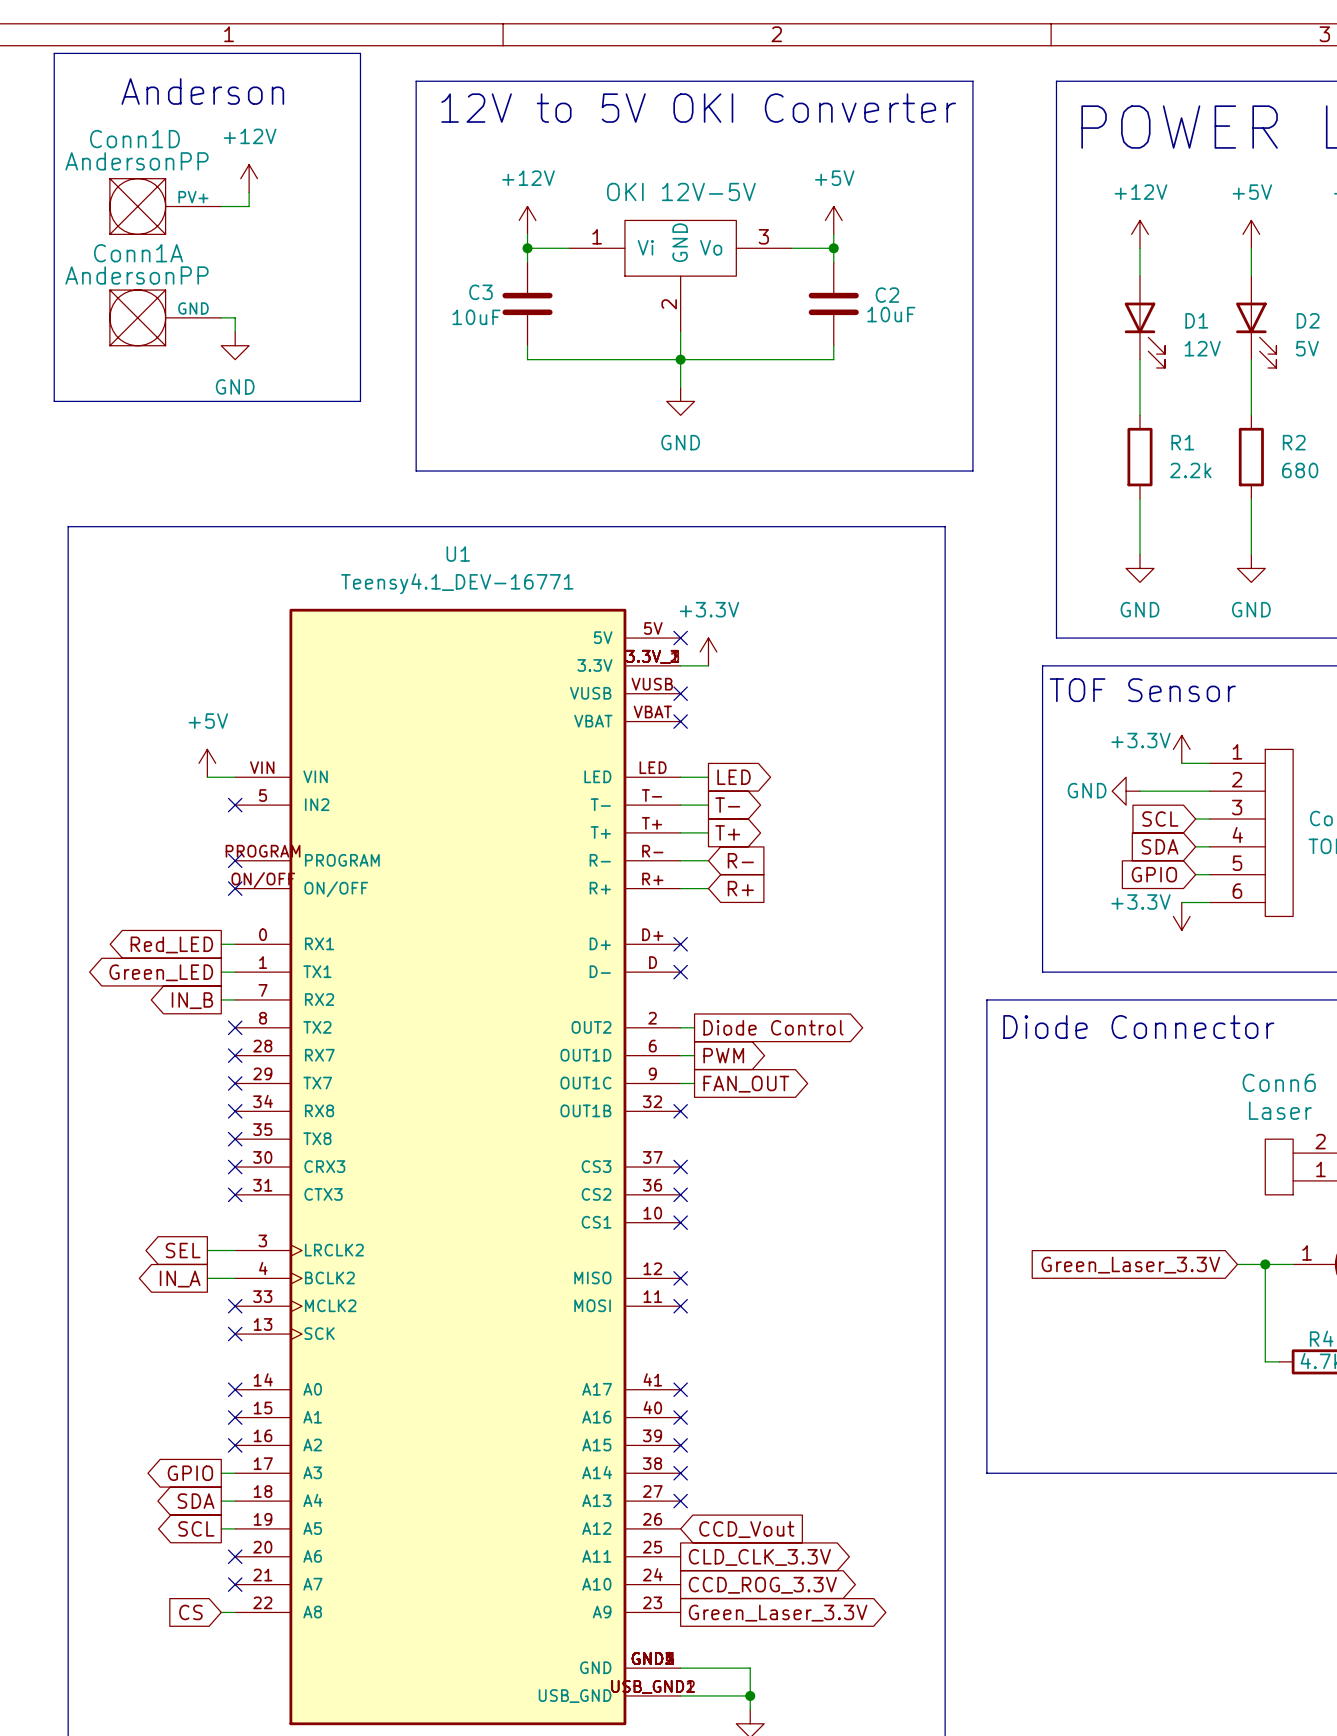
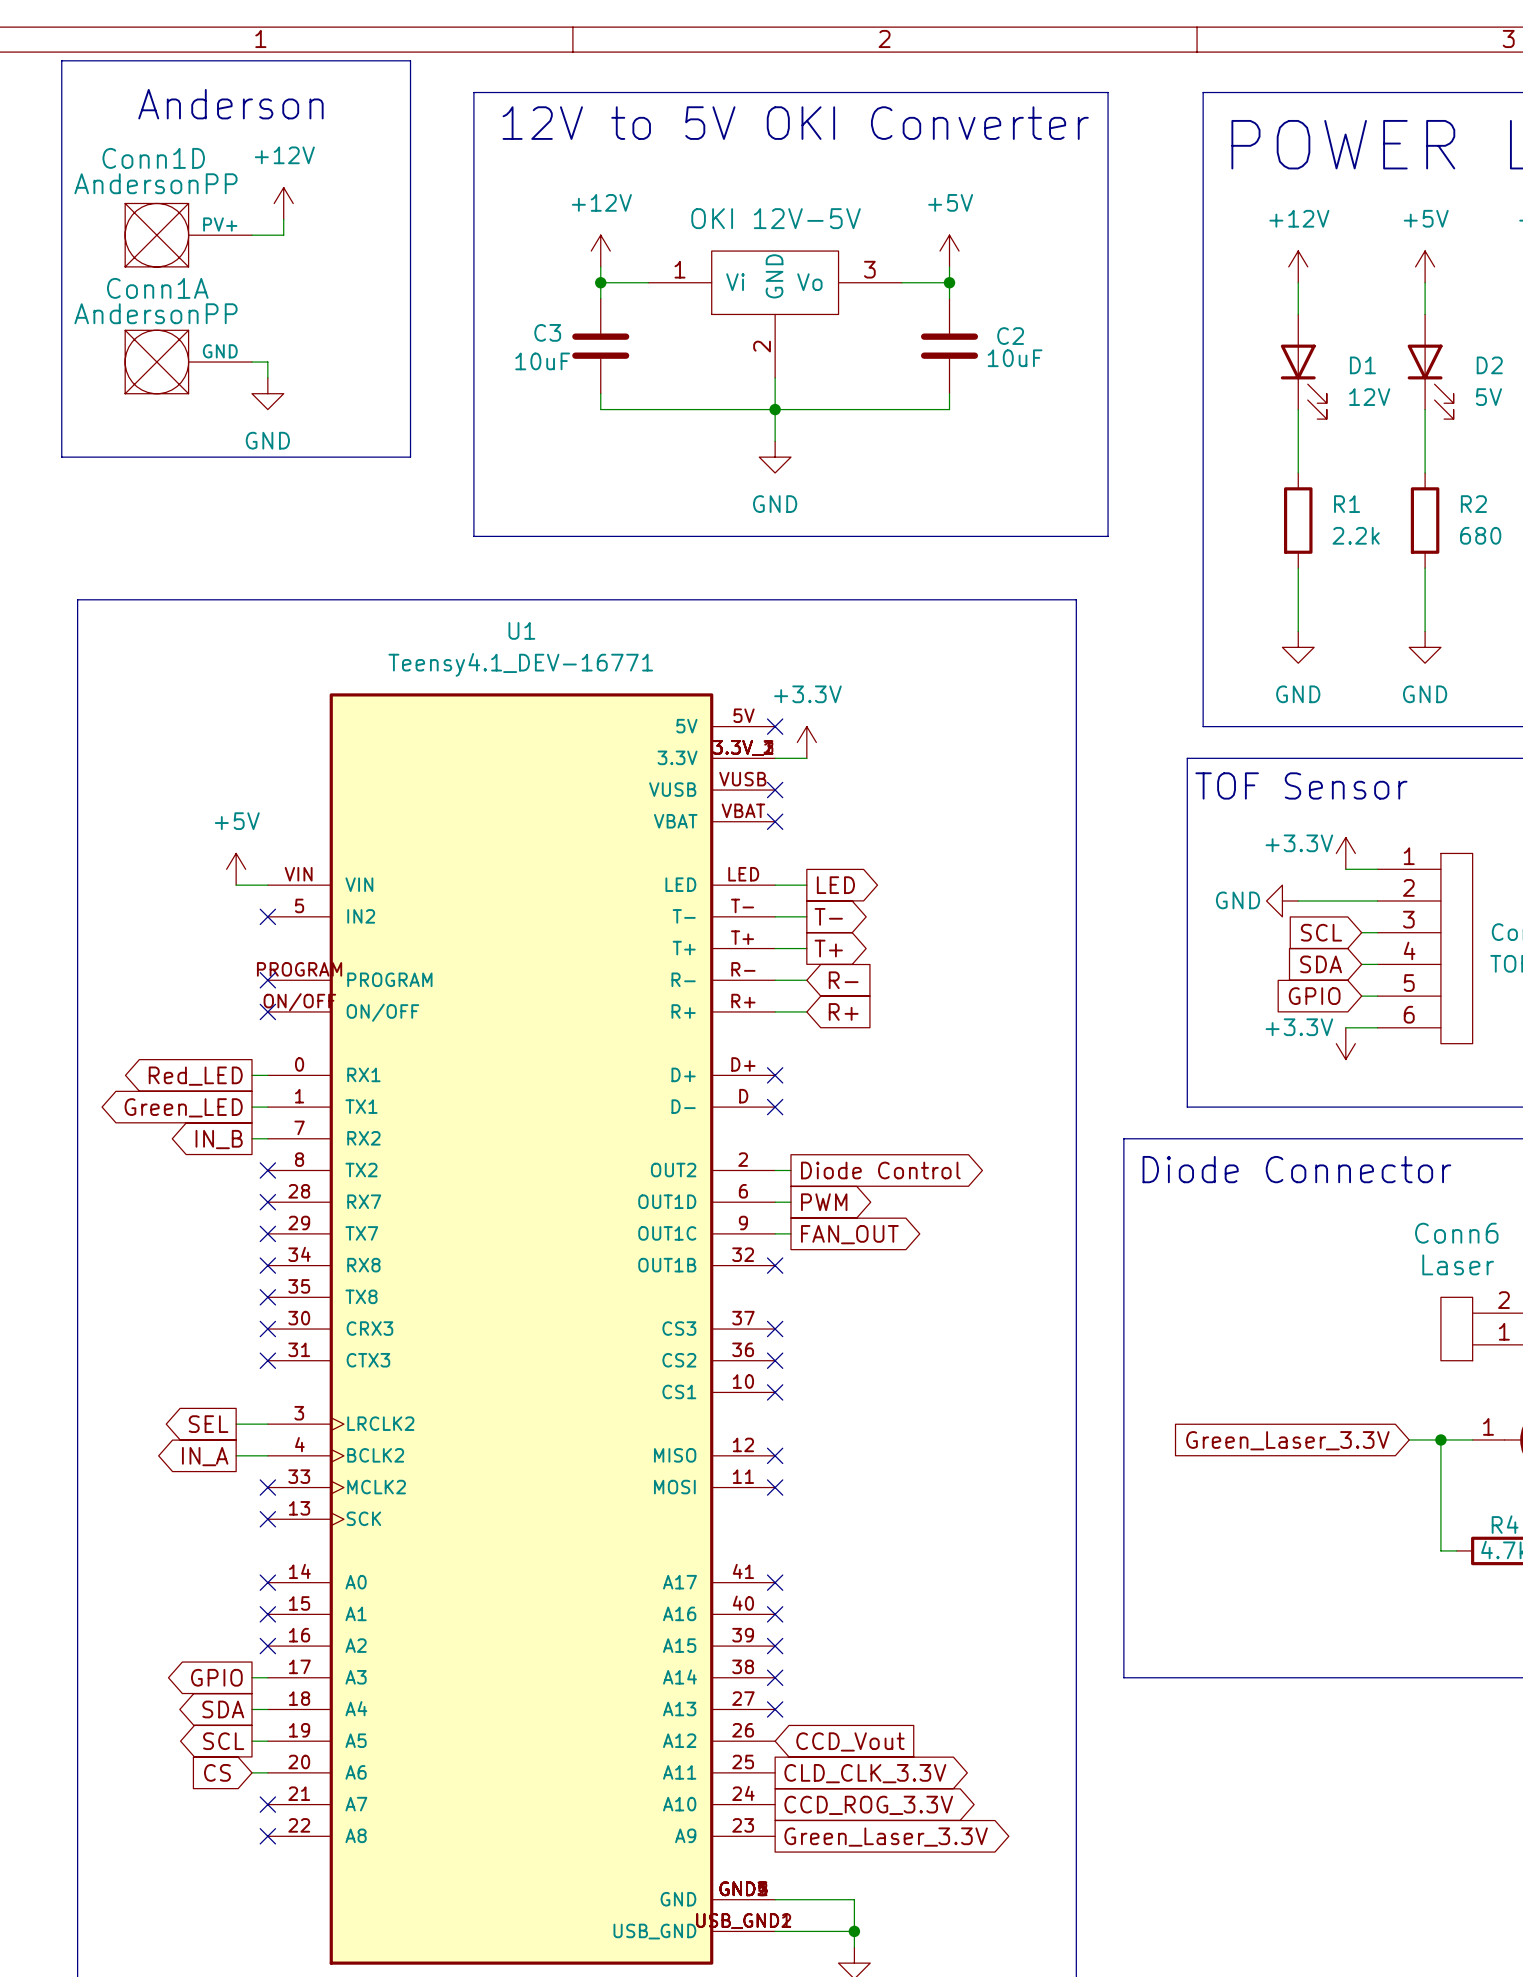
no-connect mark position: (235, 1556) -> (267, 1836)
global label position: CS (190, 1612) -> CS (217, 1772)
wire: (221, 1612) (235, 1612) -> (251, 1772) (267, 1772)

